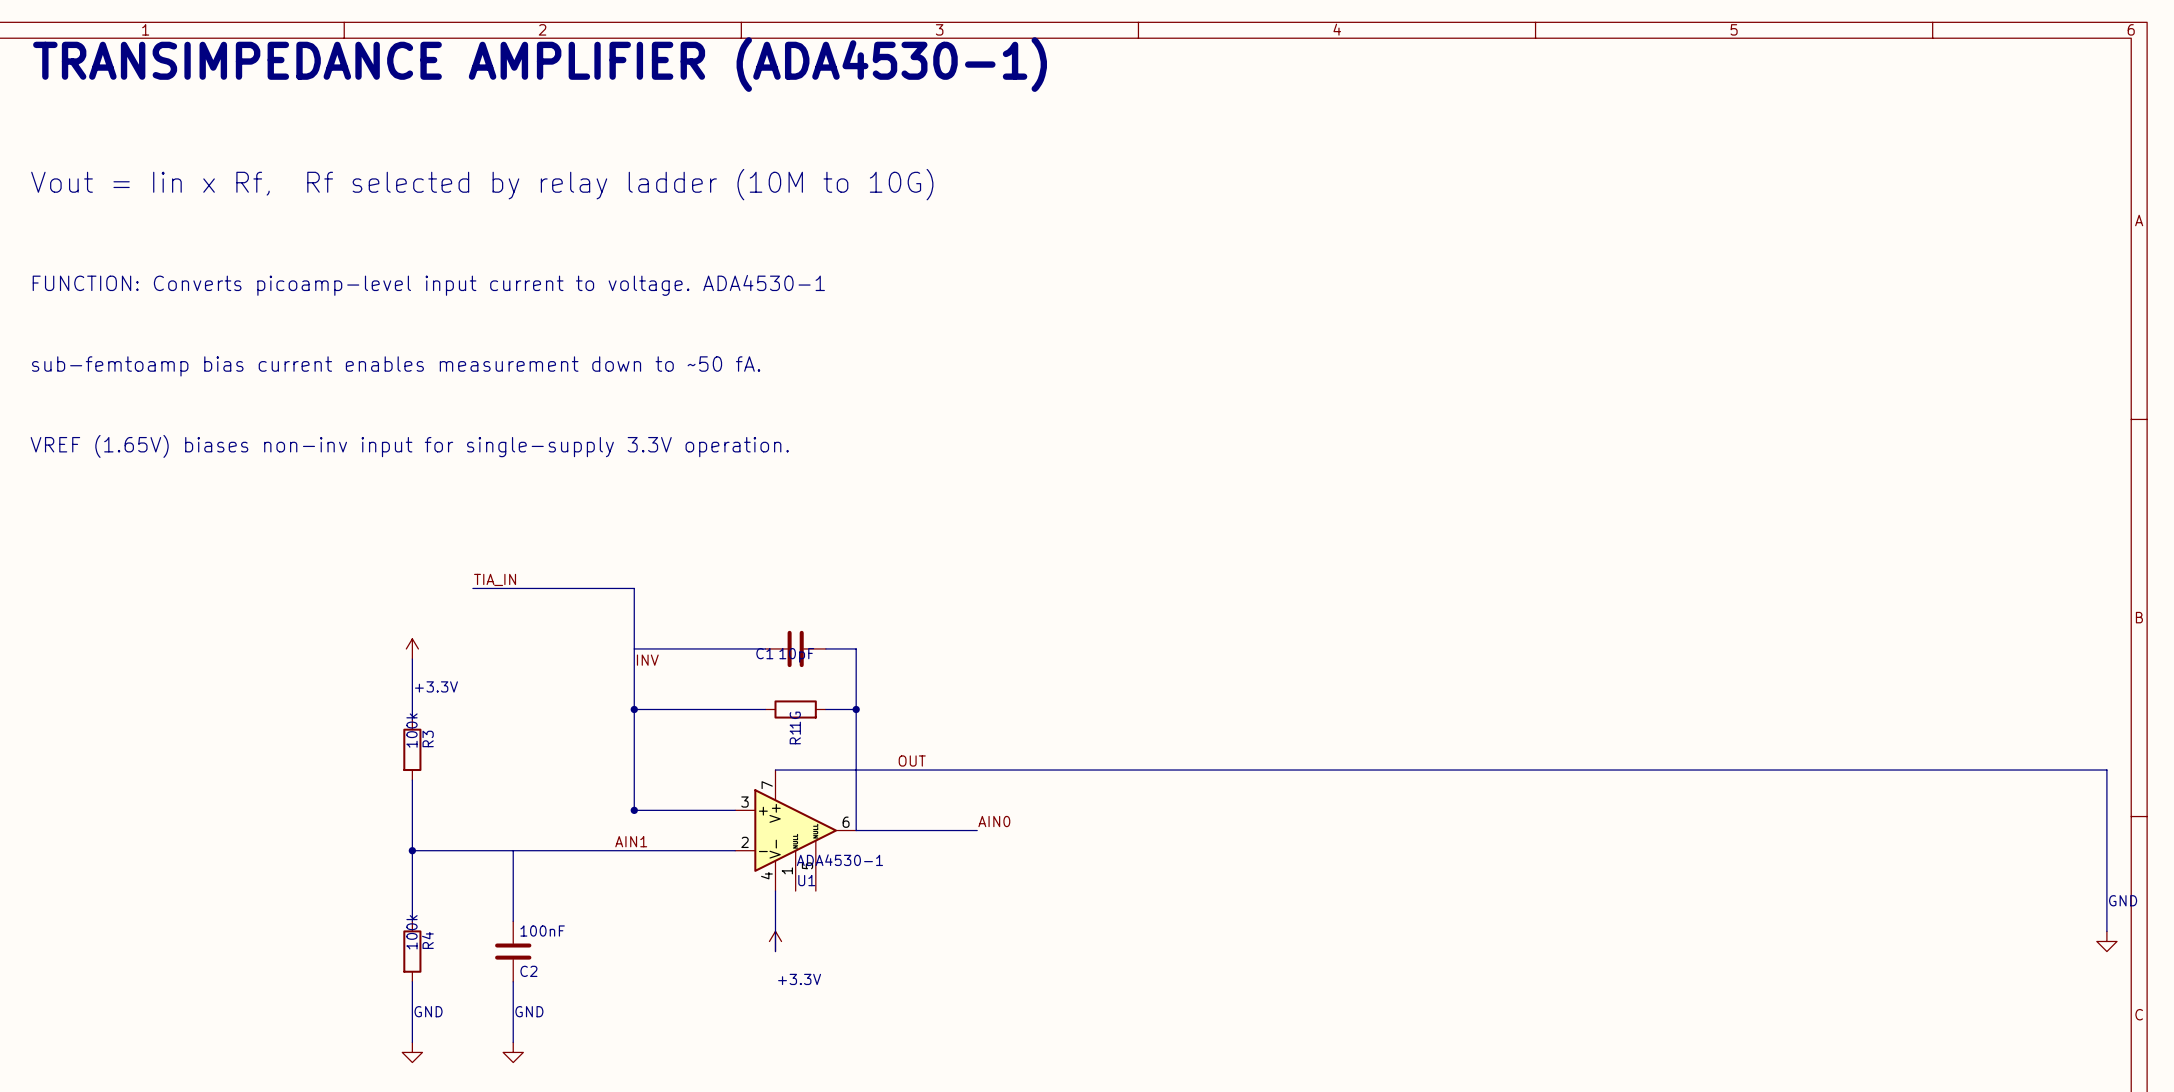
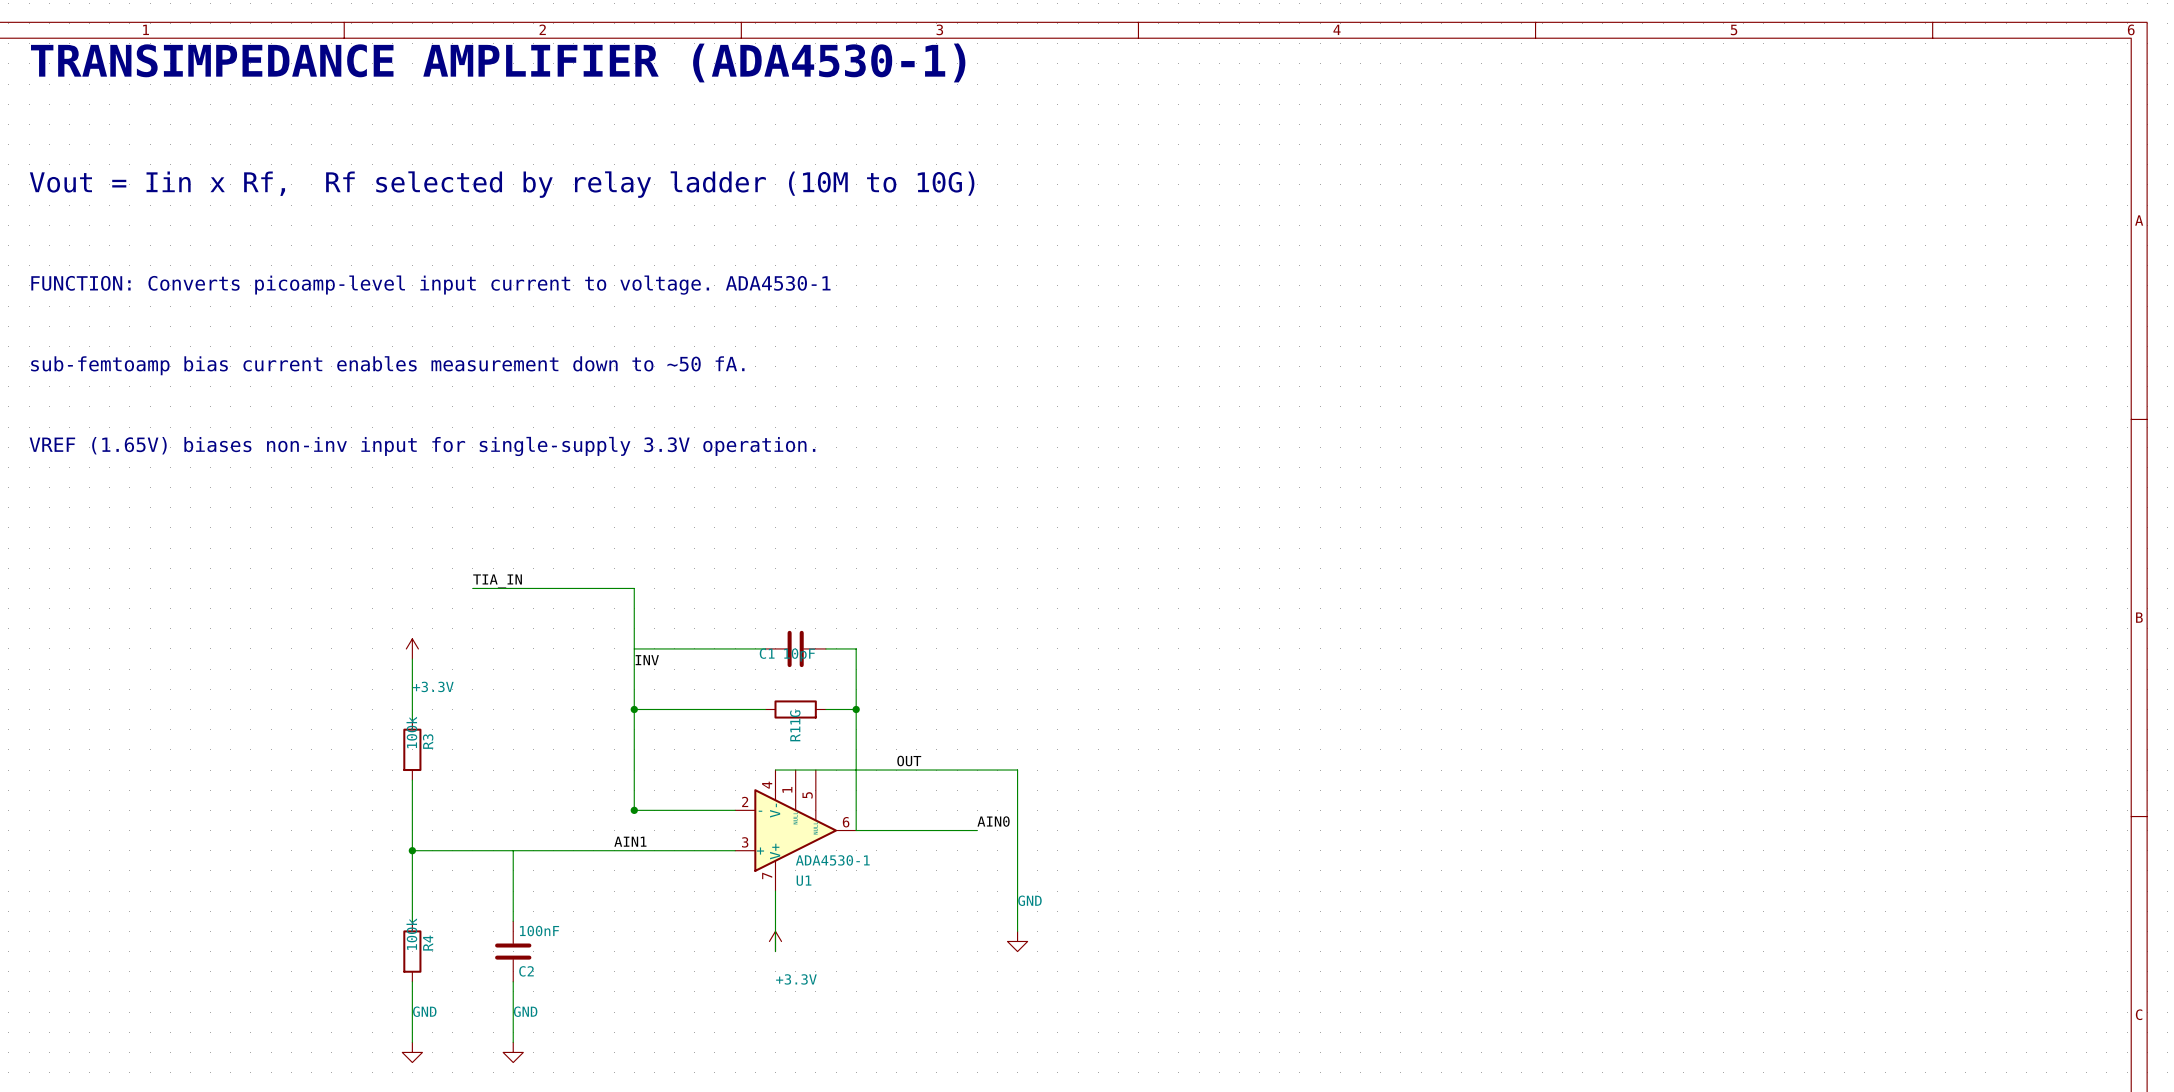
wire: (1017, 770) (2106, 770) (2106, 931) -> (1017, 770) (1017, 931)
U1 flip: as is (795, 830) -> up-down (795, 830)
power symbol: none -> GND (1017, 941)
power symbol: GND (2106, 941) -> none

